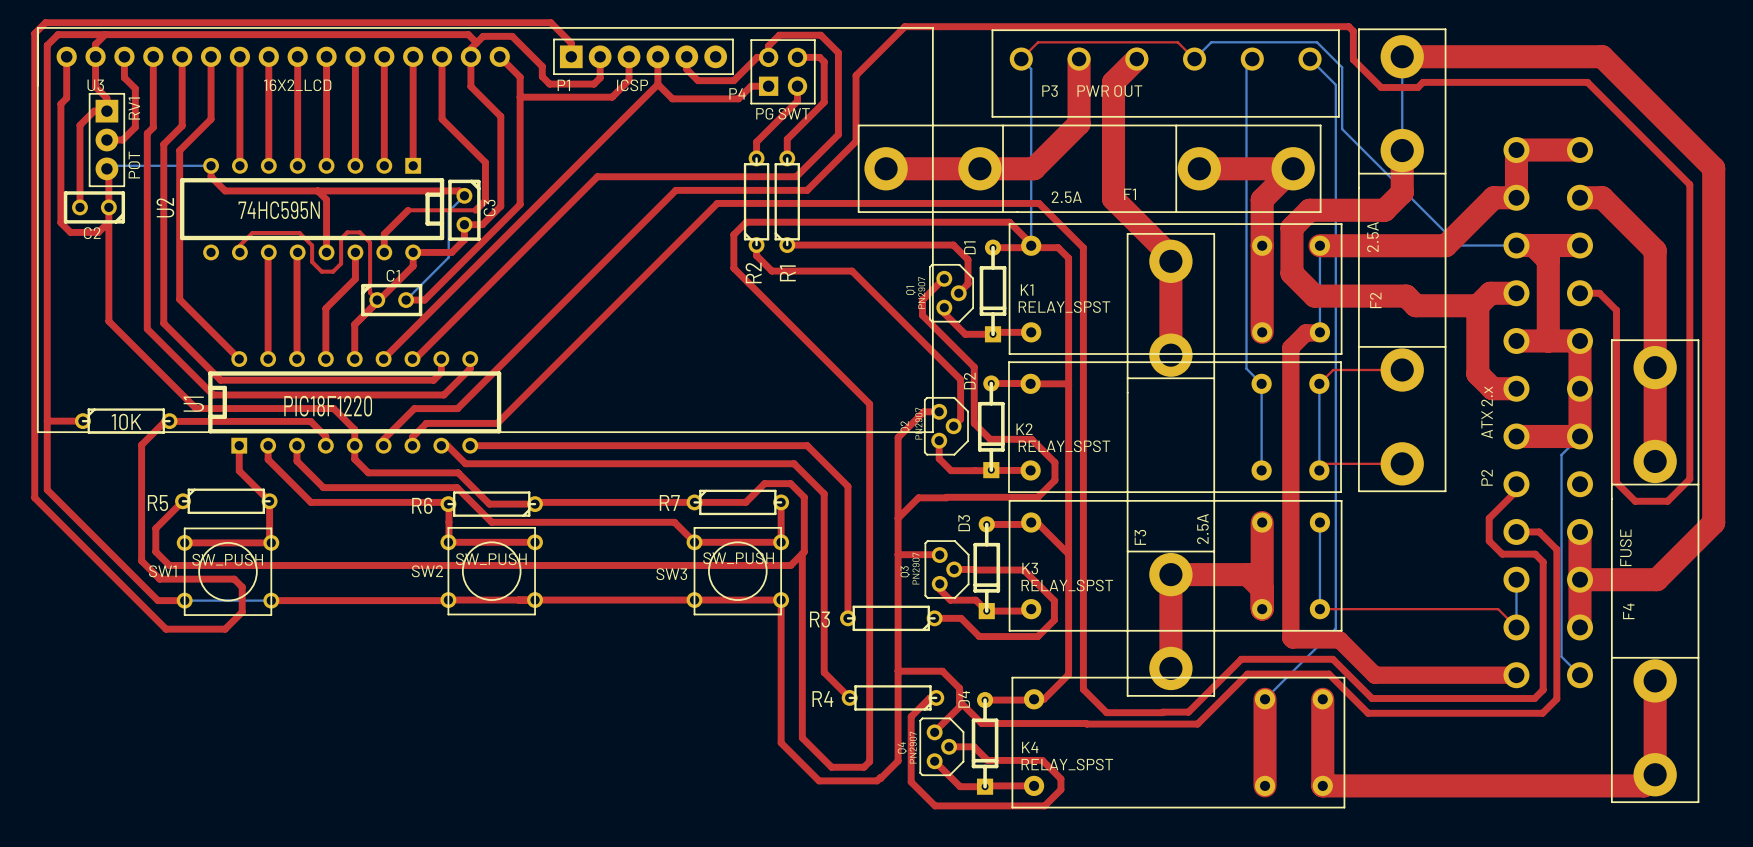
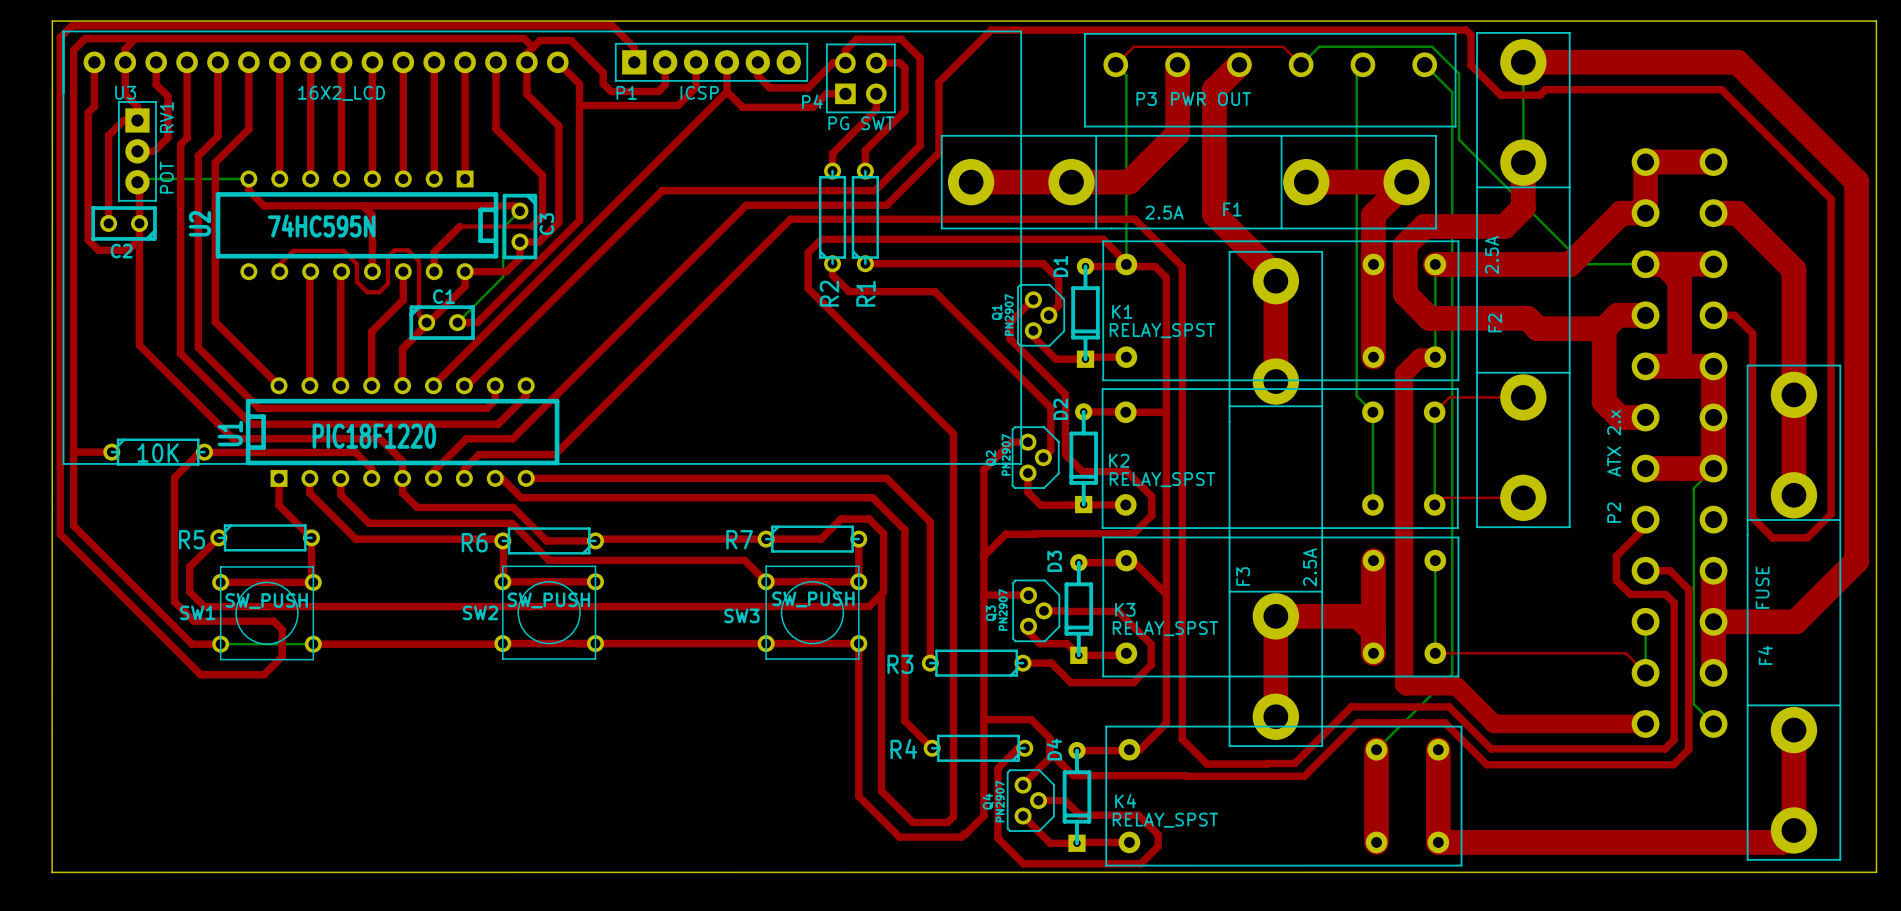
board edge: none -> (52, 21) (52, 872) (1876, 872) (1876, 21) (52, 21)

